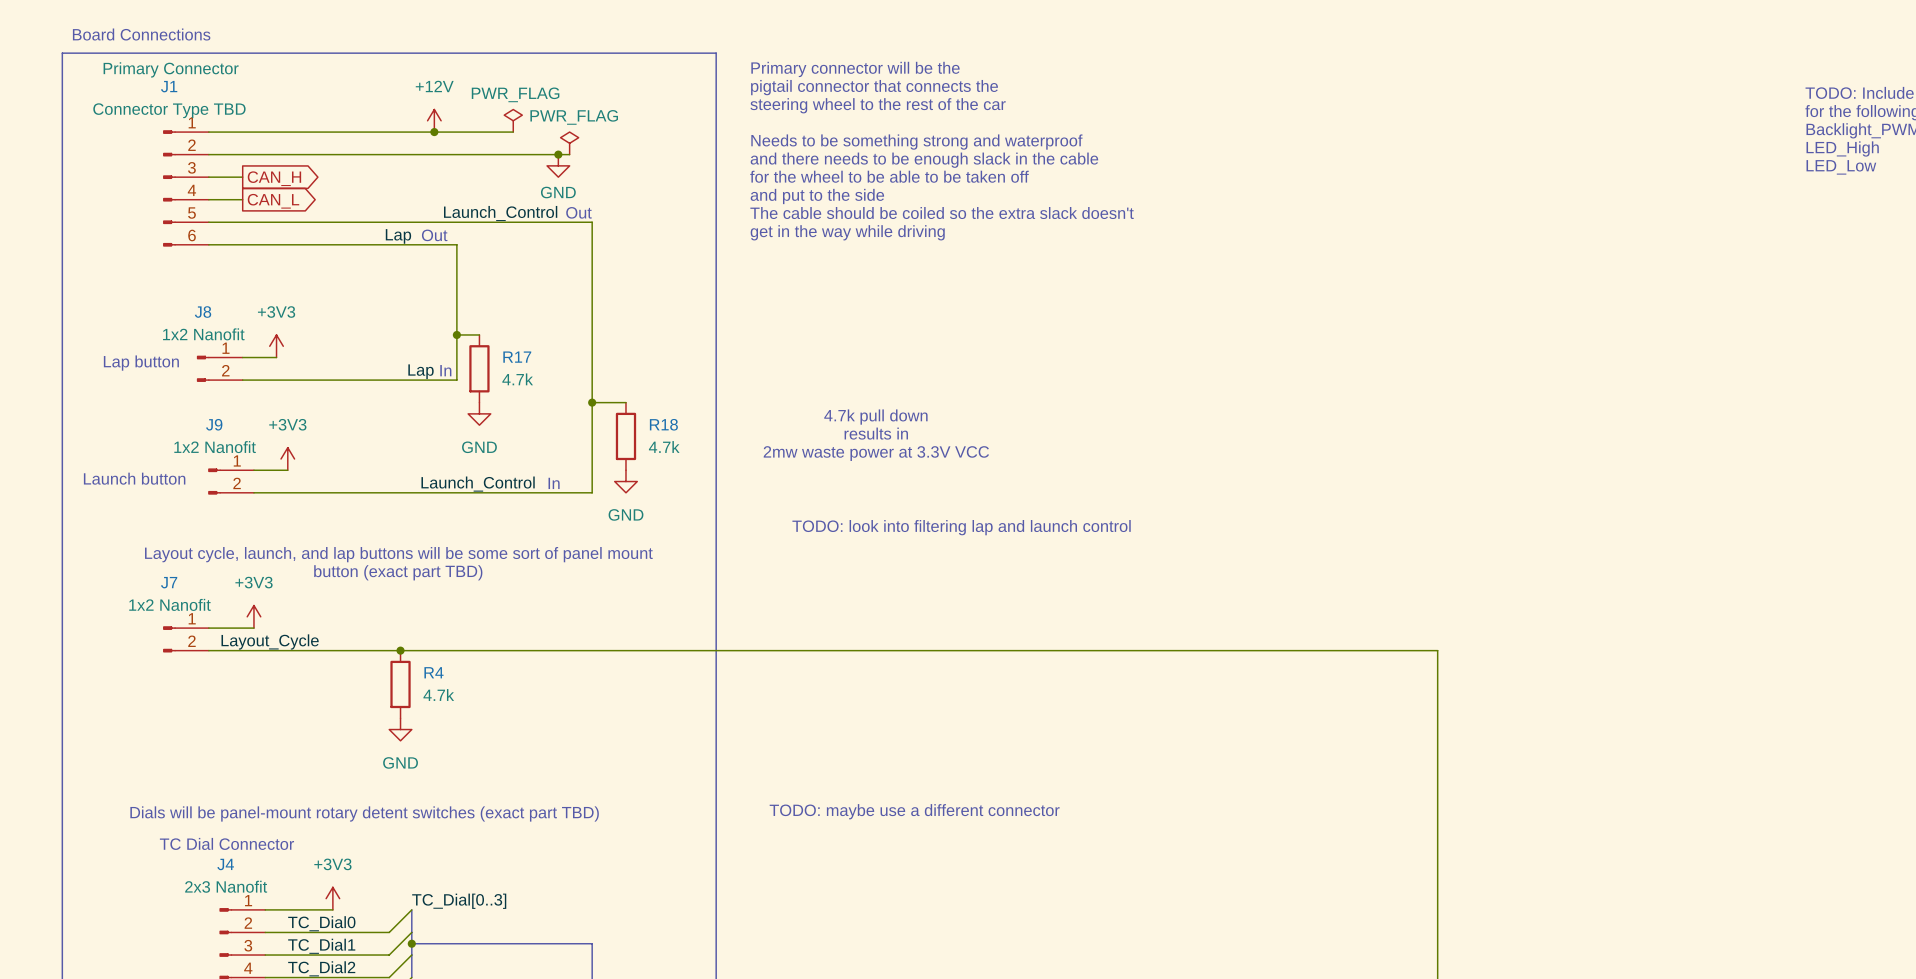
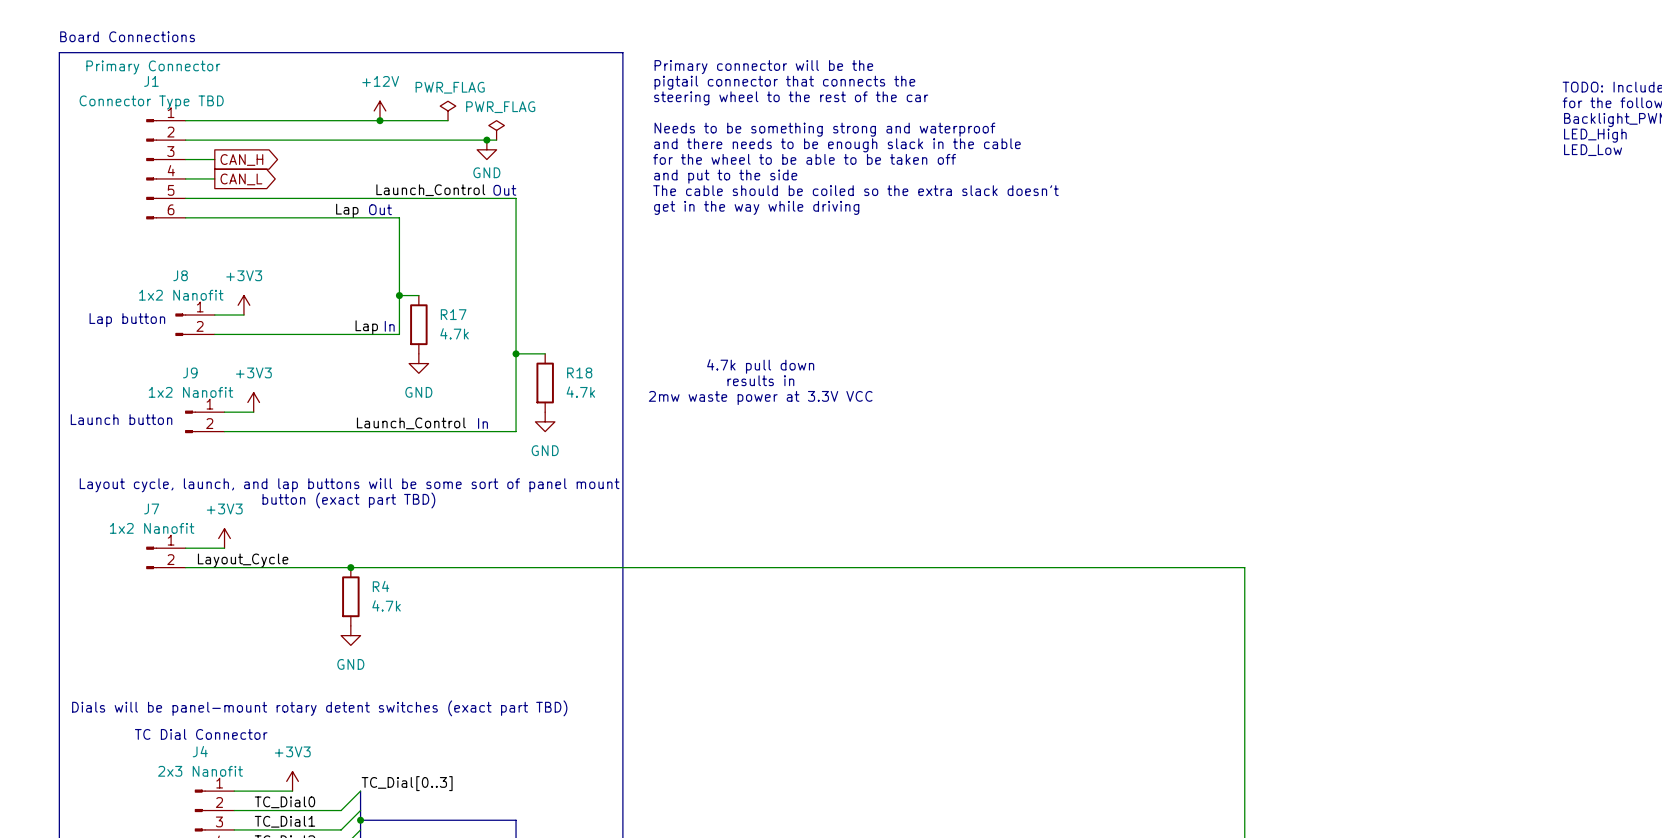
text: TODO: look into filtering lap and launch control (961, 527) -> none
text: TODO: maybe use a different connector (914, 811) -> none

